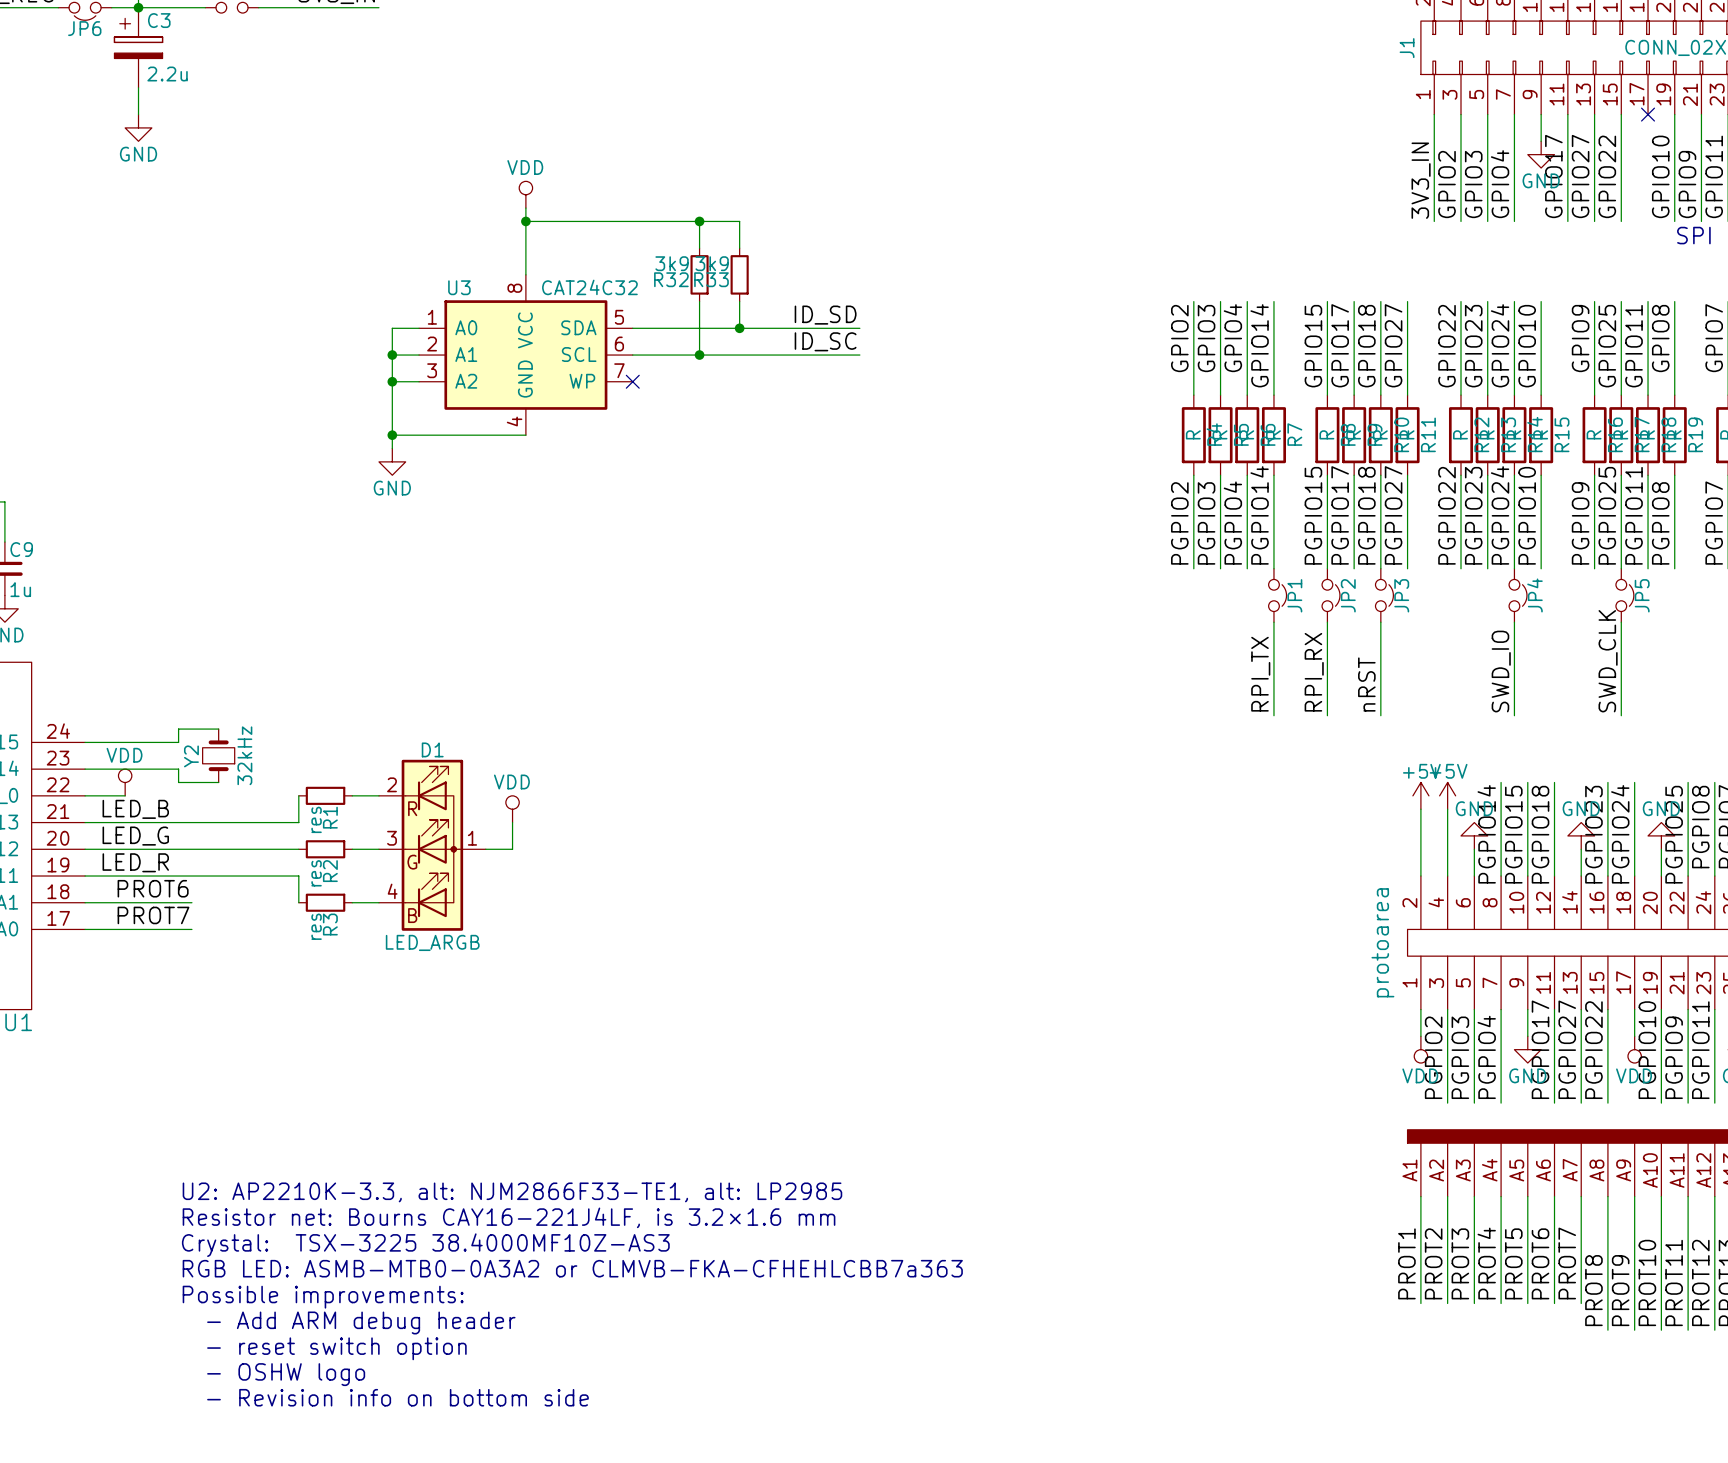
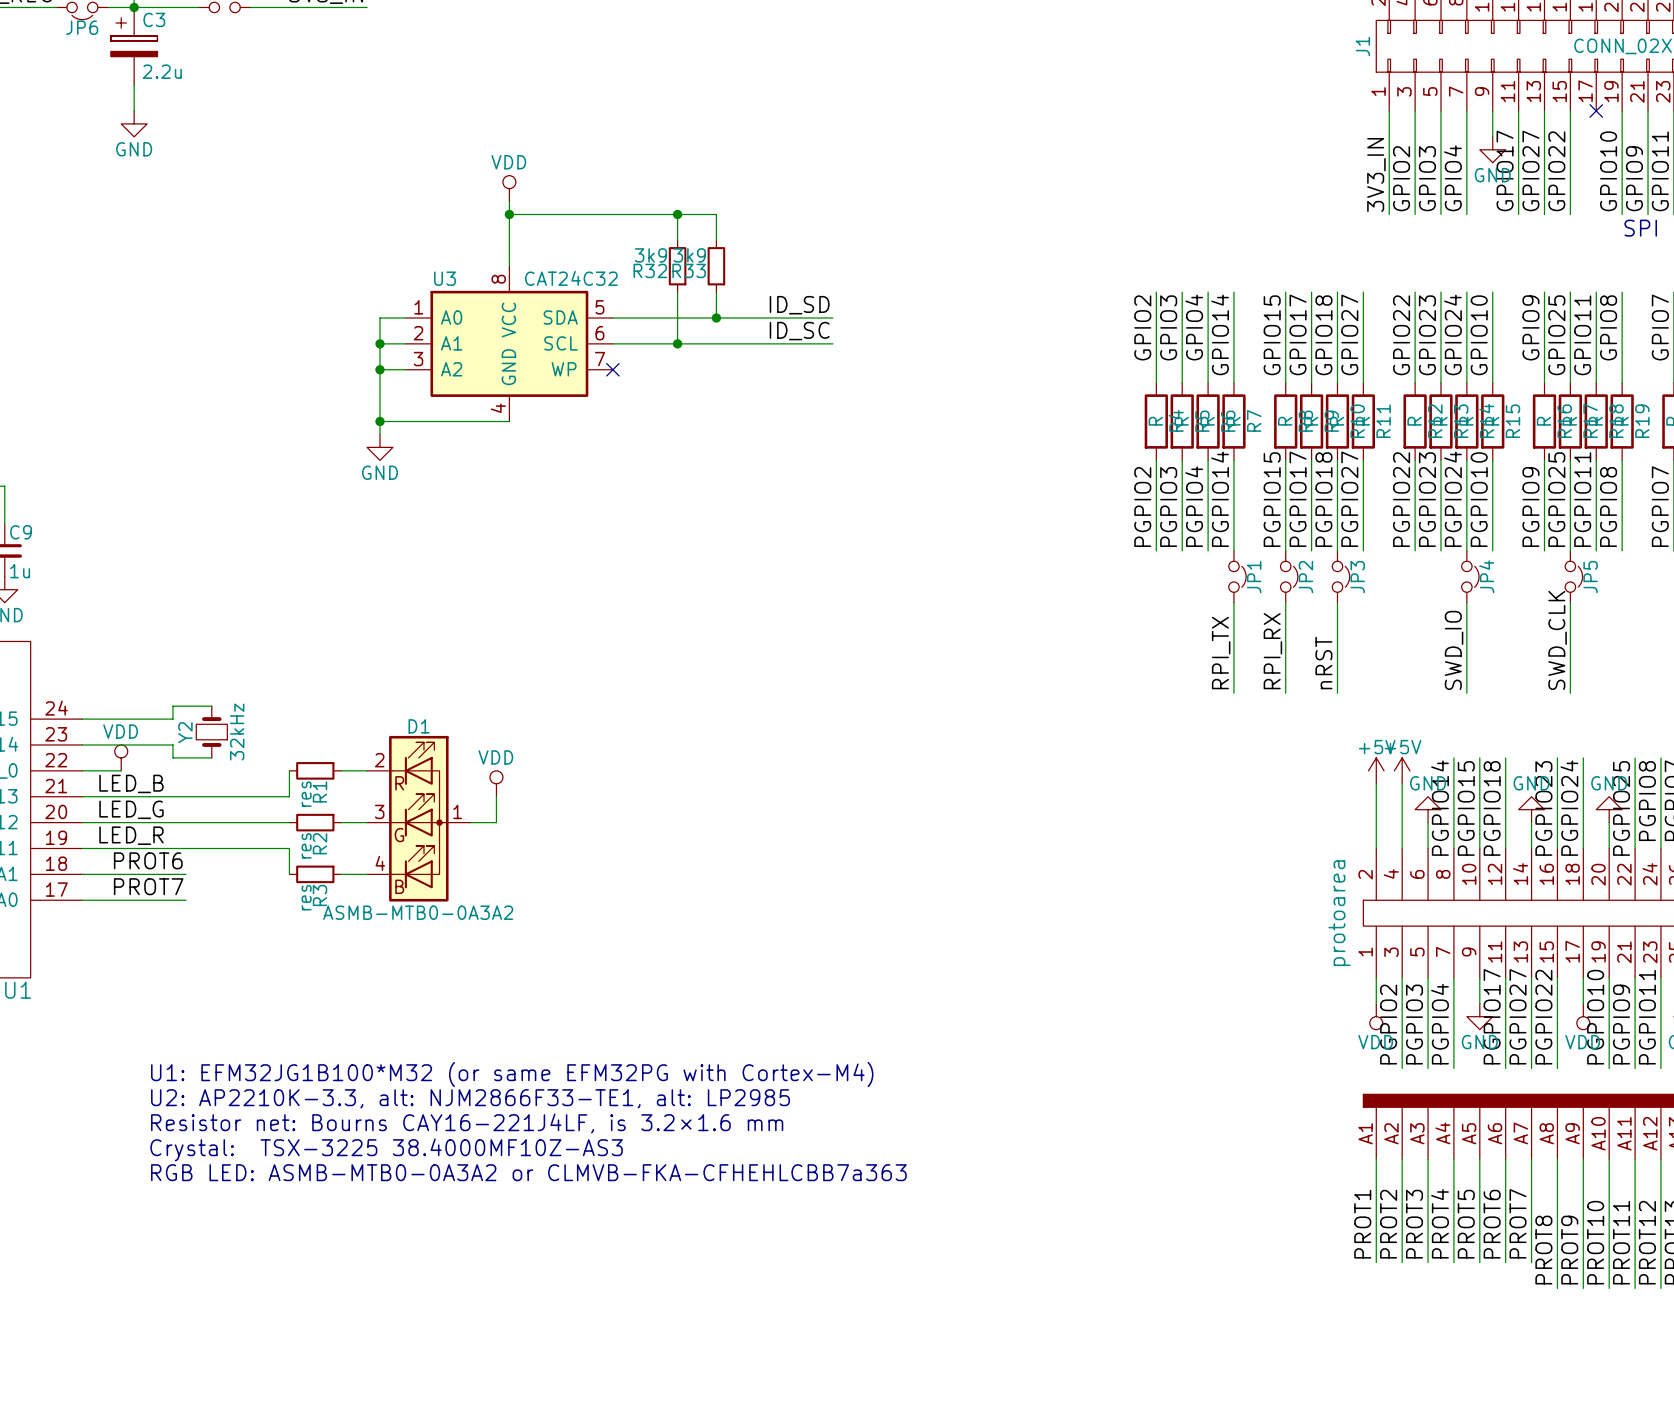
D1 value: LED_ARGB (432, 942) -> ASMB-MTB0-0A3A2 (418, 912)
text: none -> U1: EFM32JG1B100*M32 (or same EFM32PG with Cortex-M4) (512, 1074)
text position: U2: AP2210K-3.3, alt: NJM2866F33-TE1, alt: LP2985 (512, 1192) -> U2: AP2210K-3.3, alt: NJM2866F33-TE1, alt: LP2985 (470, 1098)
text position: Resistor net: Bourns CAY16-221J4LF, is 3.2×1.6 mm (509, 1217) -> Resistor net: Bourns CAY16-221J4LF, is 3.2×1.6 mm (467, 1123)
text position: Crystal: TSX-3225 38.4000MF10Z-AS3 (425, 1245) -> Crystal: TSX-3225 38.4000MF10Z-AS3 (386, 1149)
text position: RGB LED: ASMB-MTB0-0A3A2 or CLMVB-FKA-CFHEHLCBB7a363 (572, 1268) -> RGB LED: ASMB-MTB0-0A3A2 or CLMVB-FKA-CFHEHLCBB7a363 (528, 1172)
text: Possible improvements: (323, 1297) -> none
text: - Add ARM debug header (361, 1322) -> none
text: - reset switch option (336, 1348) -> none
text: - OSHW logo (286, 1374) -> none
text: - Revision info on bottom side (397, 1397) -> none

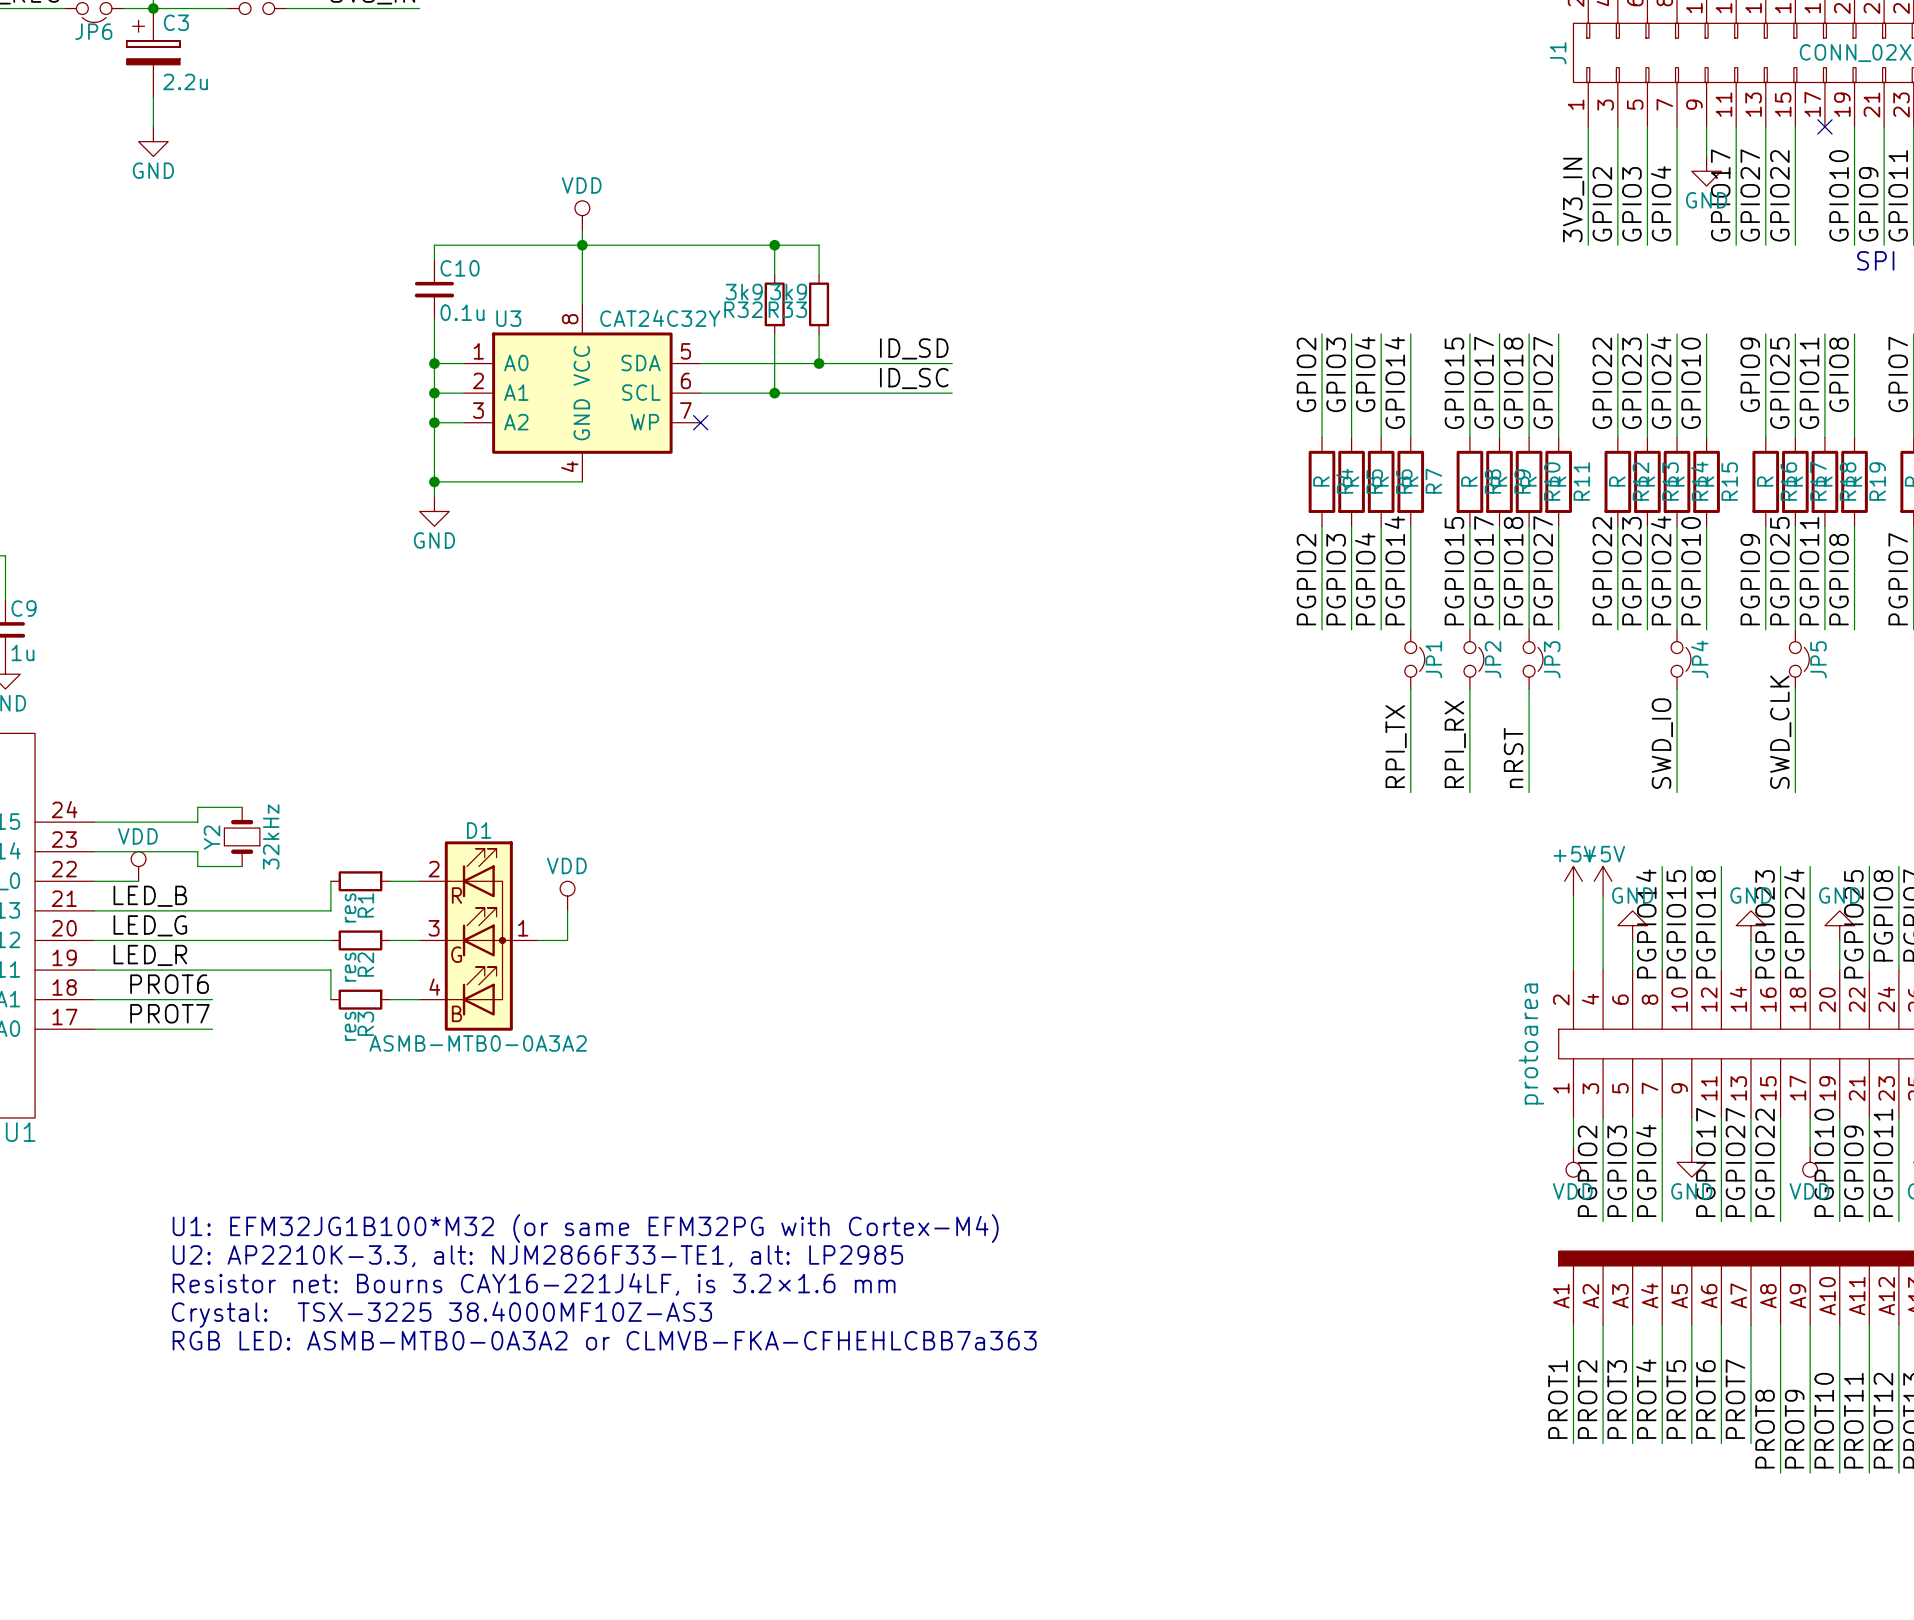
wire: none -> (582, 245) (434, 245) (434, 260)
C10: none -> 0.1u (434, 289)
U3 value: CAT24C32 (571, 278) -> CAT24C32Y (660, 318)
wire: none -> (434, 319) (434, 363)
junction: none -> (434, 363)

